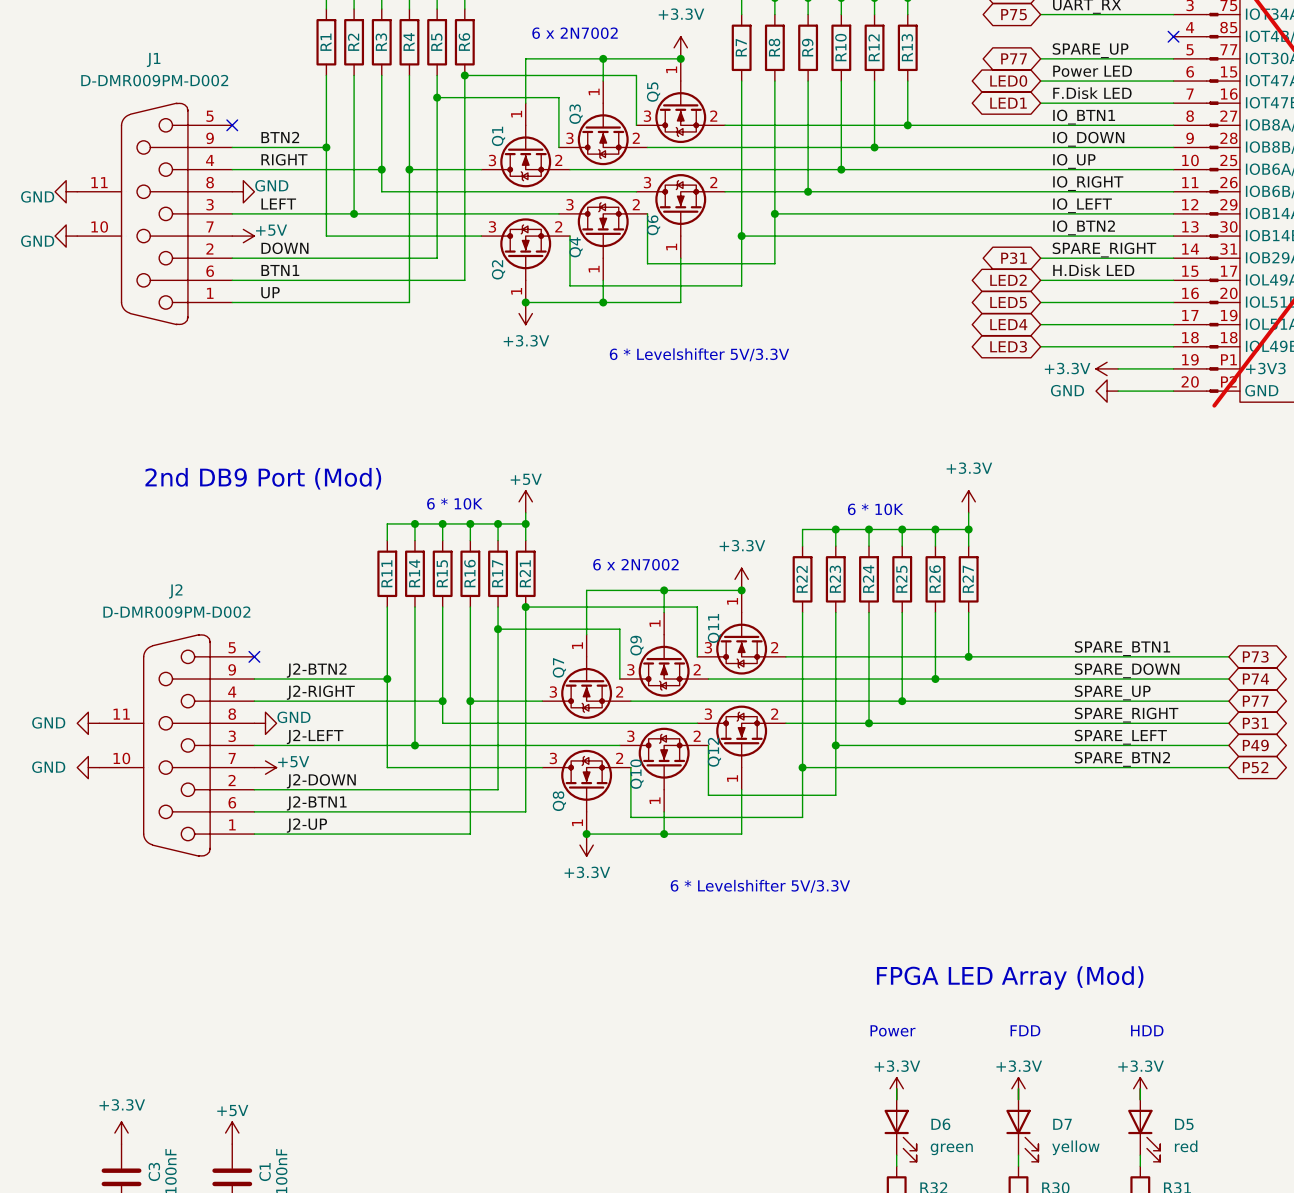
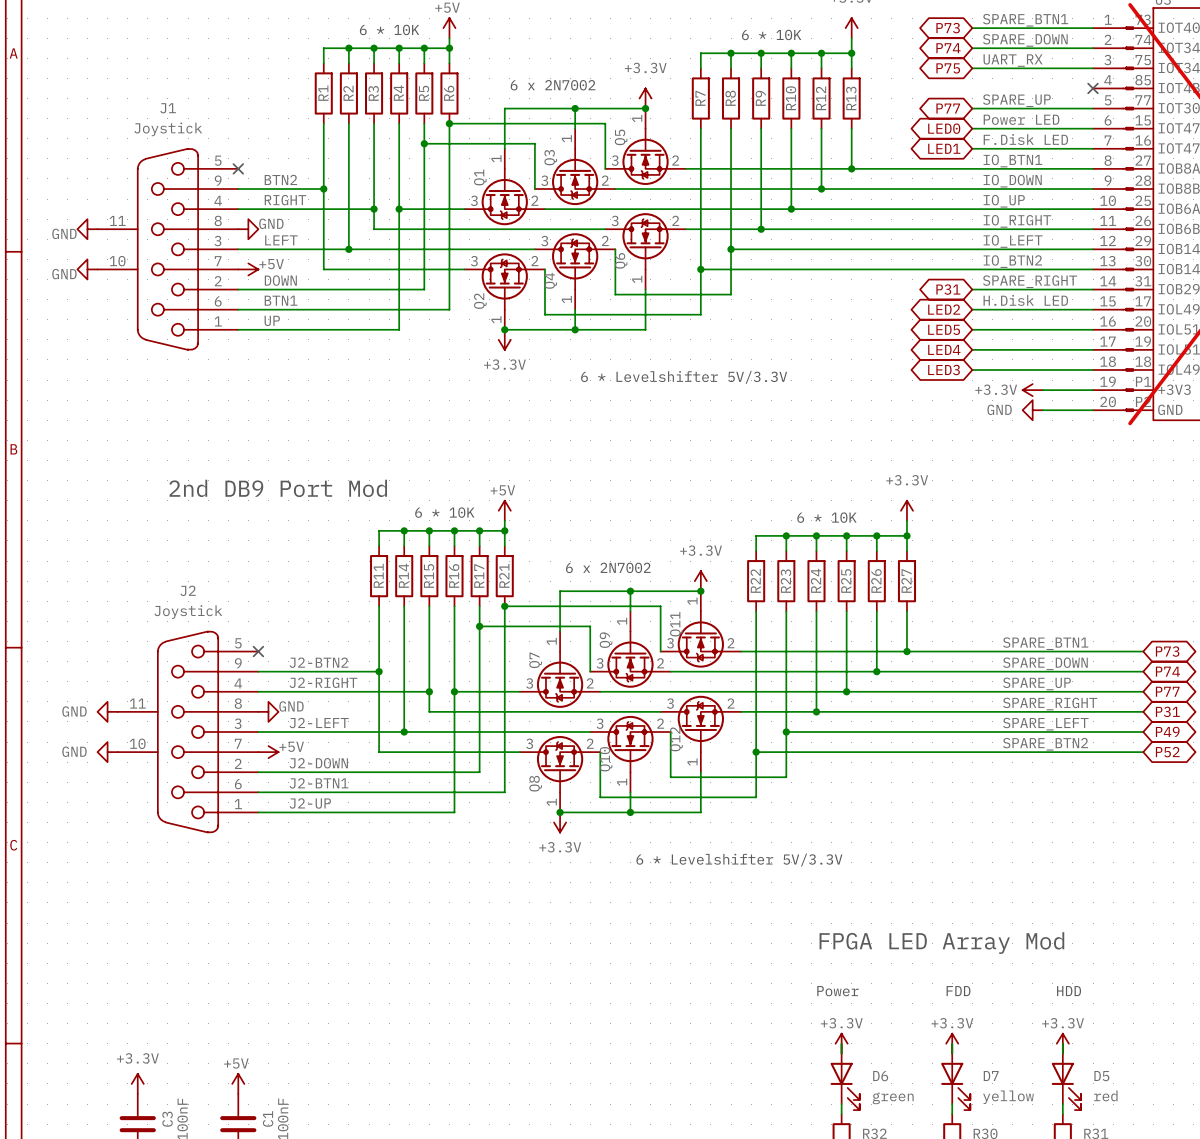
J1 value: D-DMR009PM-D002 (154, 80) -> Joystick (168, 129)
text: 2nd DB9 Port (Mod) (263, 478) -> 2nd DB9 Port Mod (278, 488)
J2 value: D-DMR009PM-D002 (176, 612) -> Joystick (188, 612)
text: FPGA LED Array (Mod) (1010, 978) -> FPGA LED Array Mod (941, 943)

